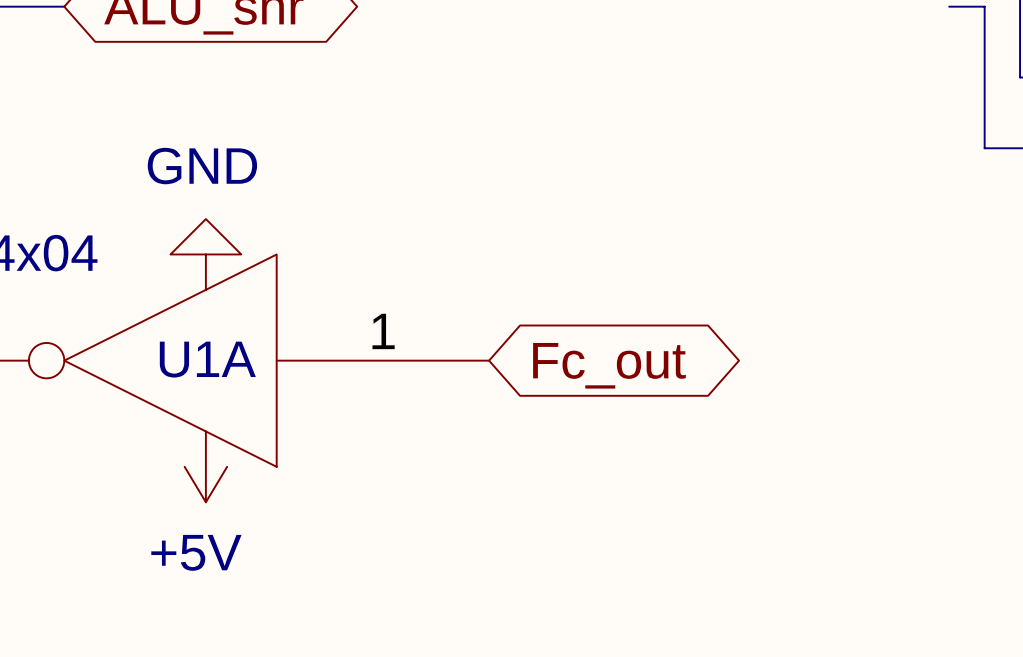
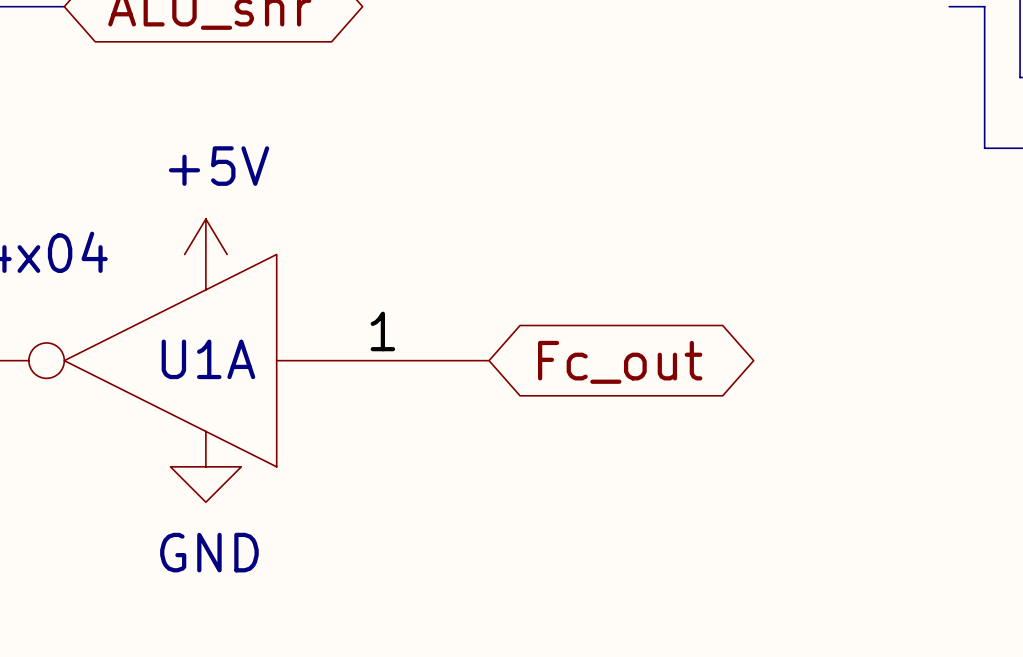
power symbol: GND (205, 254) -> +5V (205, 254)
power symbol: +5V (205, 466) -> GND (205, 466)

